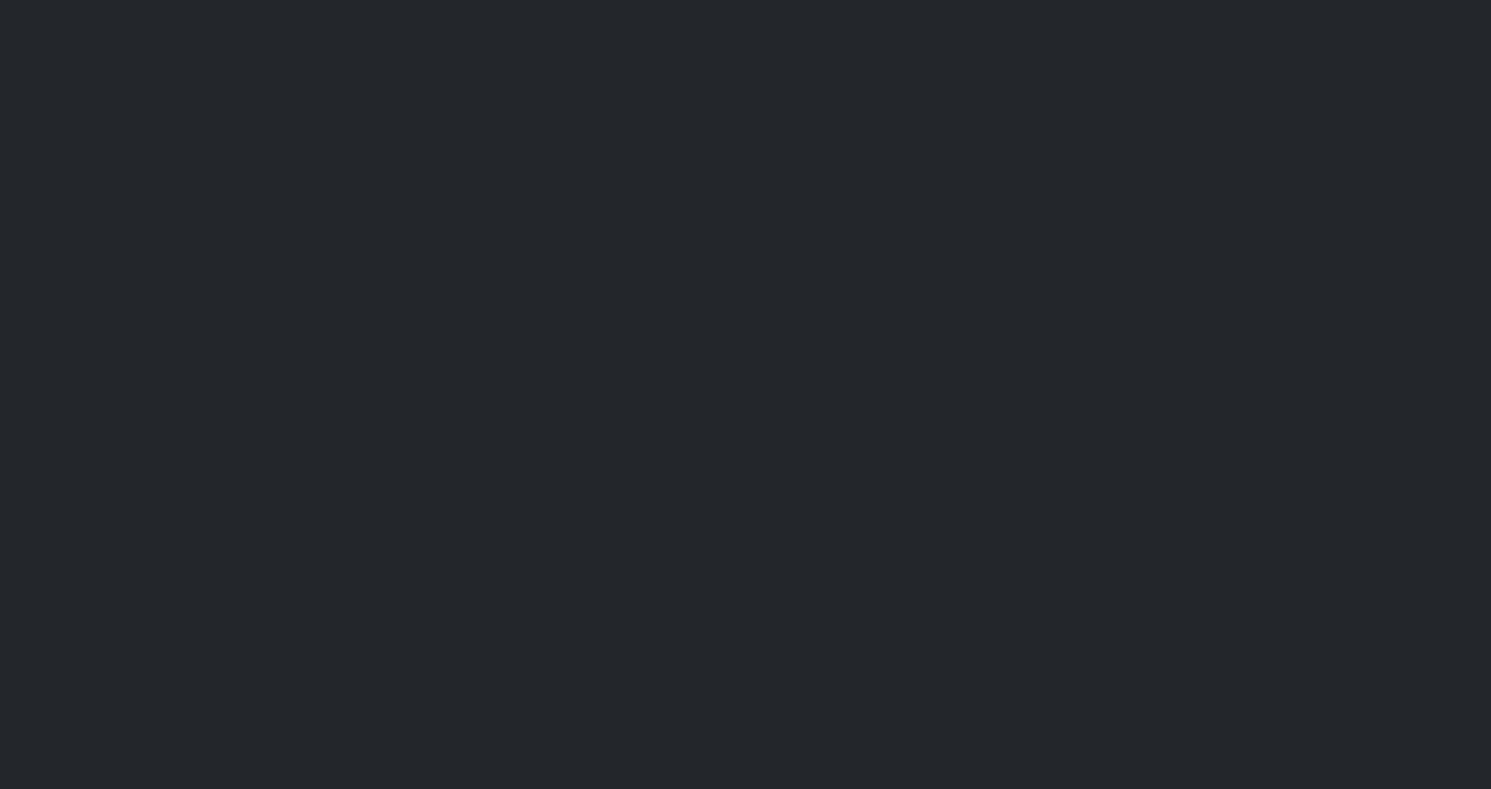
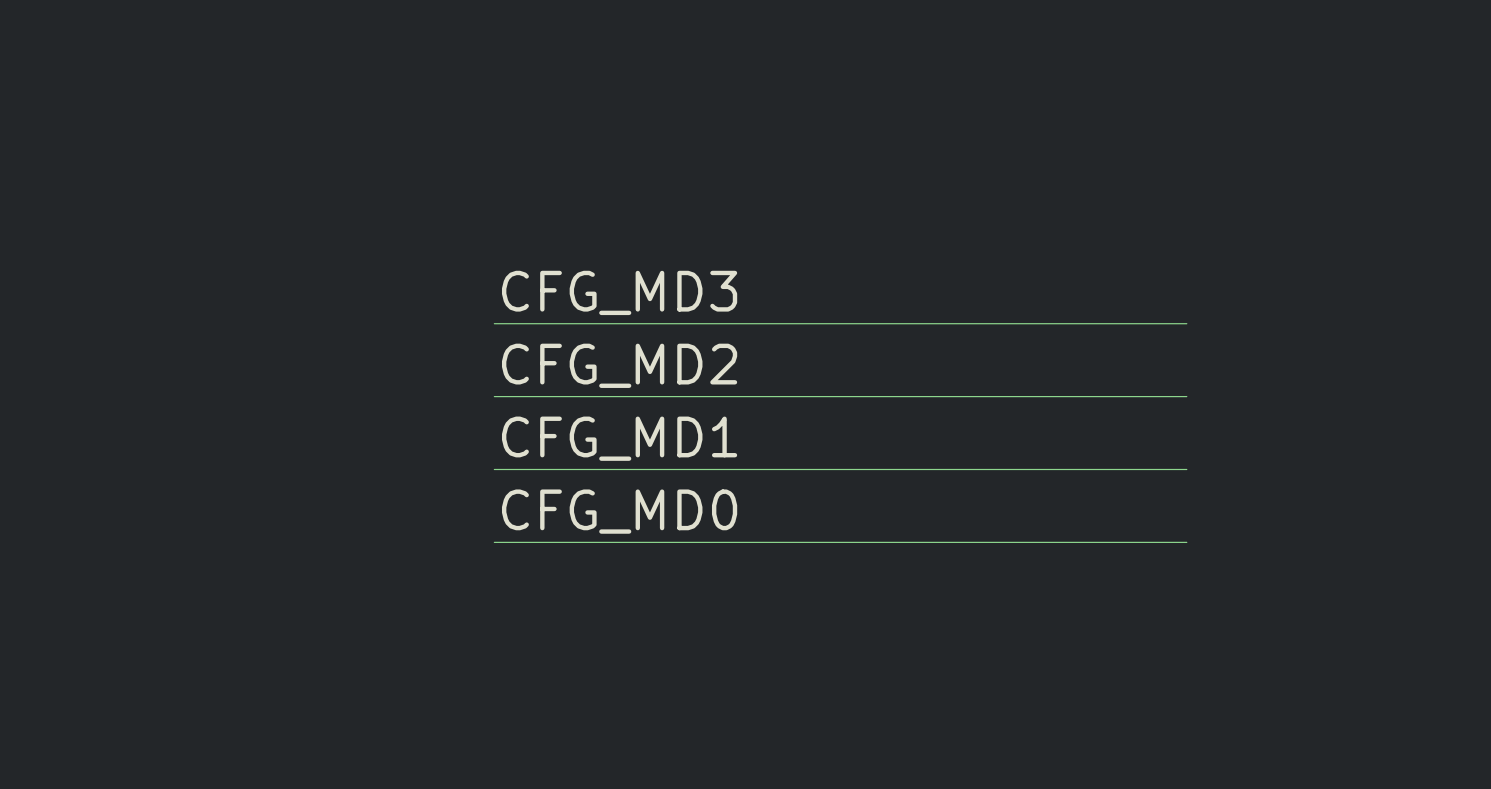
label: none -> CFG_MD3 (619, 292)
wire: none -> (494, 323) (1186, 323)
label: none -> CFG_MD2 (619, 365)
wire: none -> (494, 396) (1186, 396)
label: none -> CFG_MD1 (619, 438)
wire: none -> (494, 469) (1186, 469)
label: none -> CFG_MD0 (619, 511)
wire: none -> (494, 542) (1186, 542)

